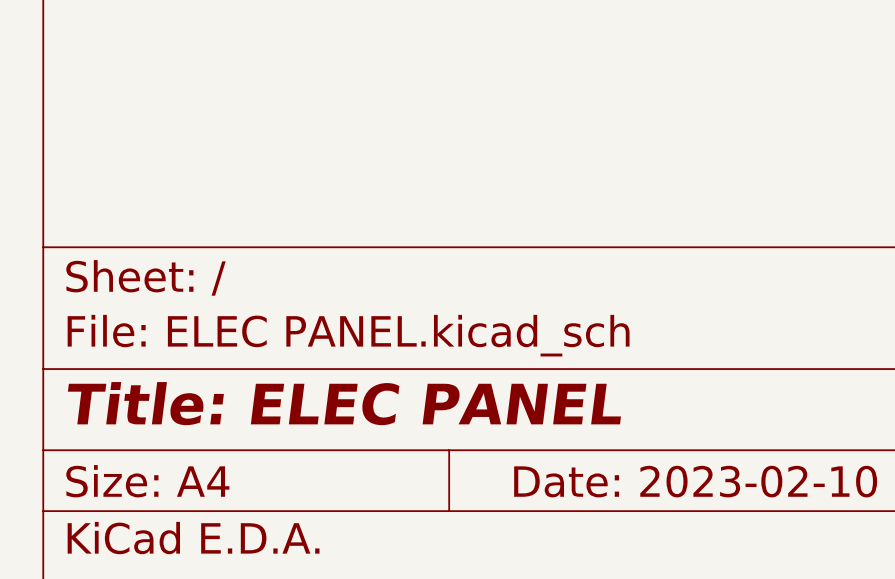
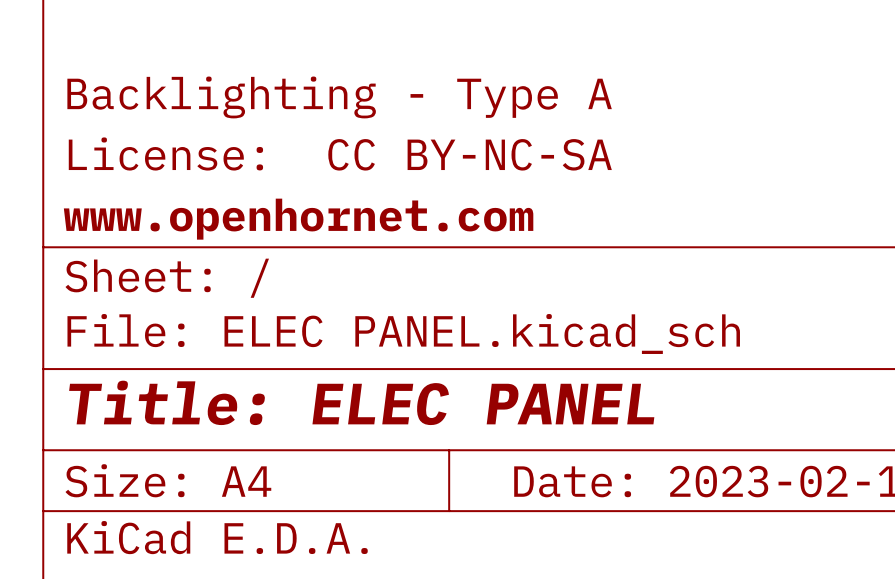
title block: none -> Backlighting - Type A (339, 97)
title block: none -> License: CC BY-NC-SA (340, 153)
title block: none -> www.openhornet.com (298, 219)

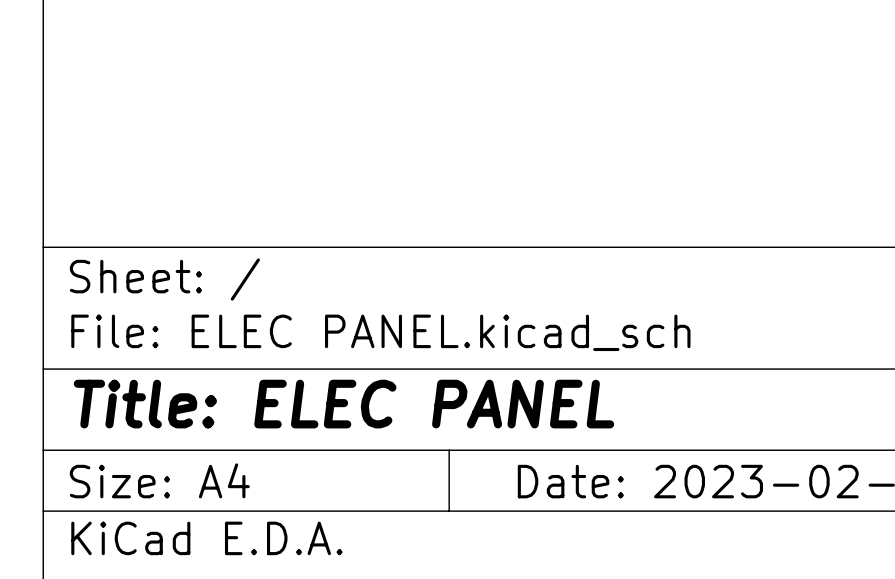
title block: Backlighting - Type A (339, 97) -> none
title block: License: CC BY-NC-SA (340, 153) -> none
title block: www.openhornet.com (298, 219) -> none

